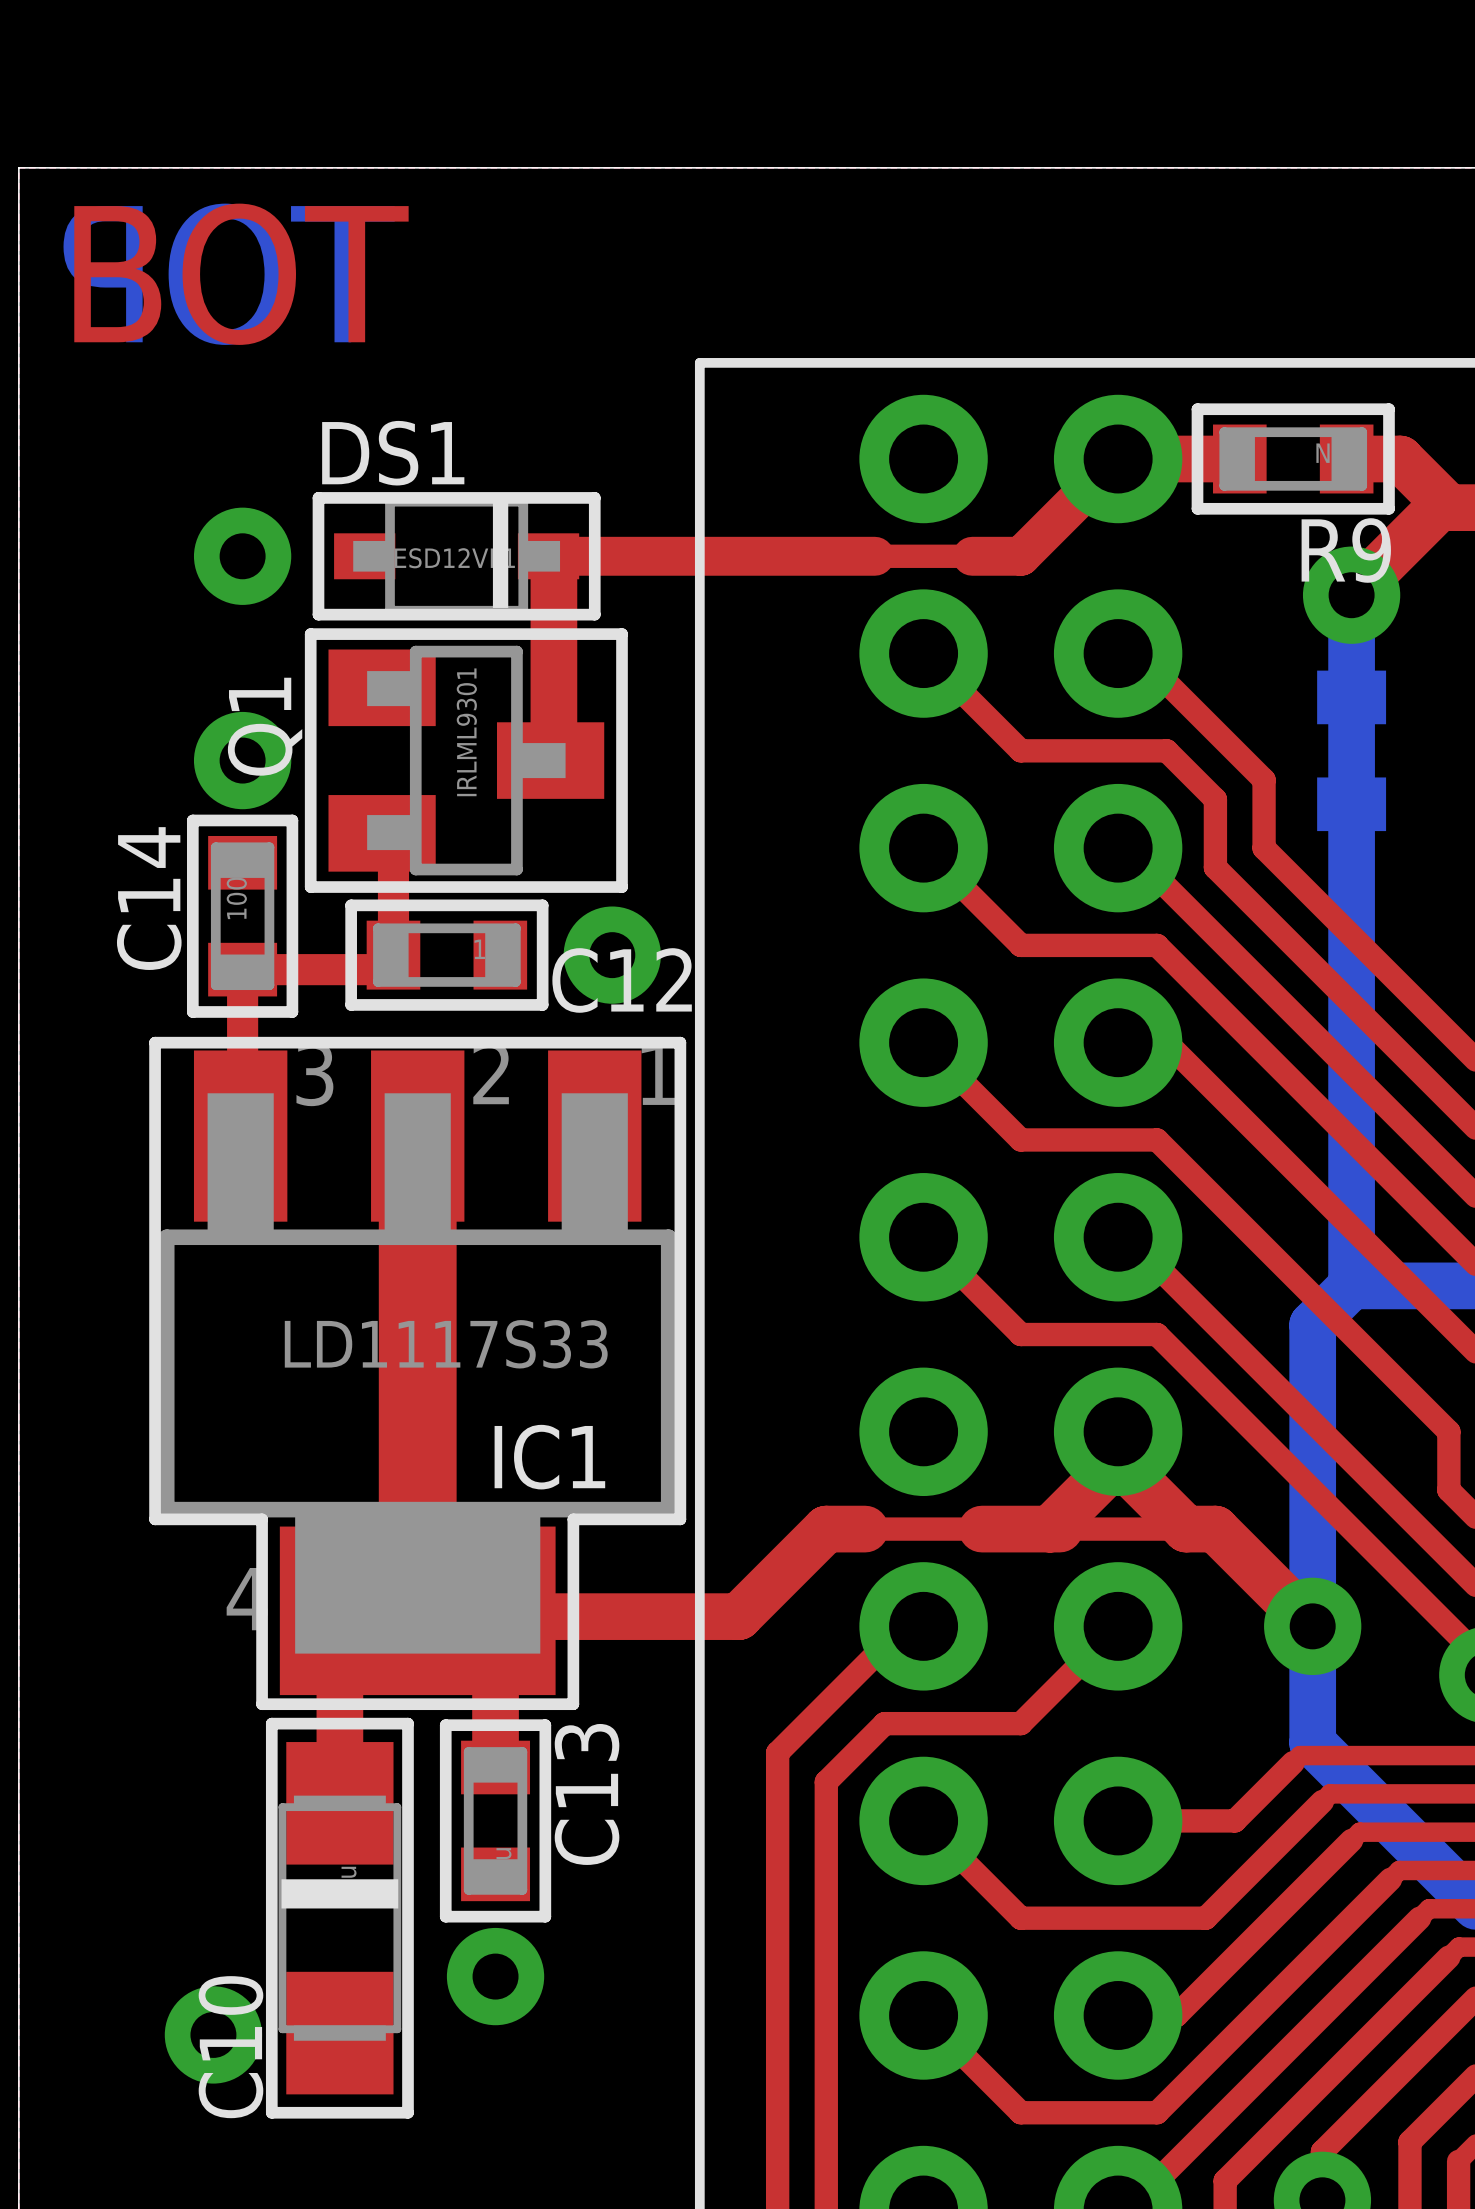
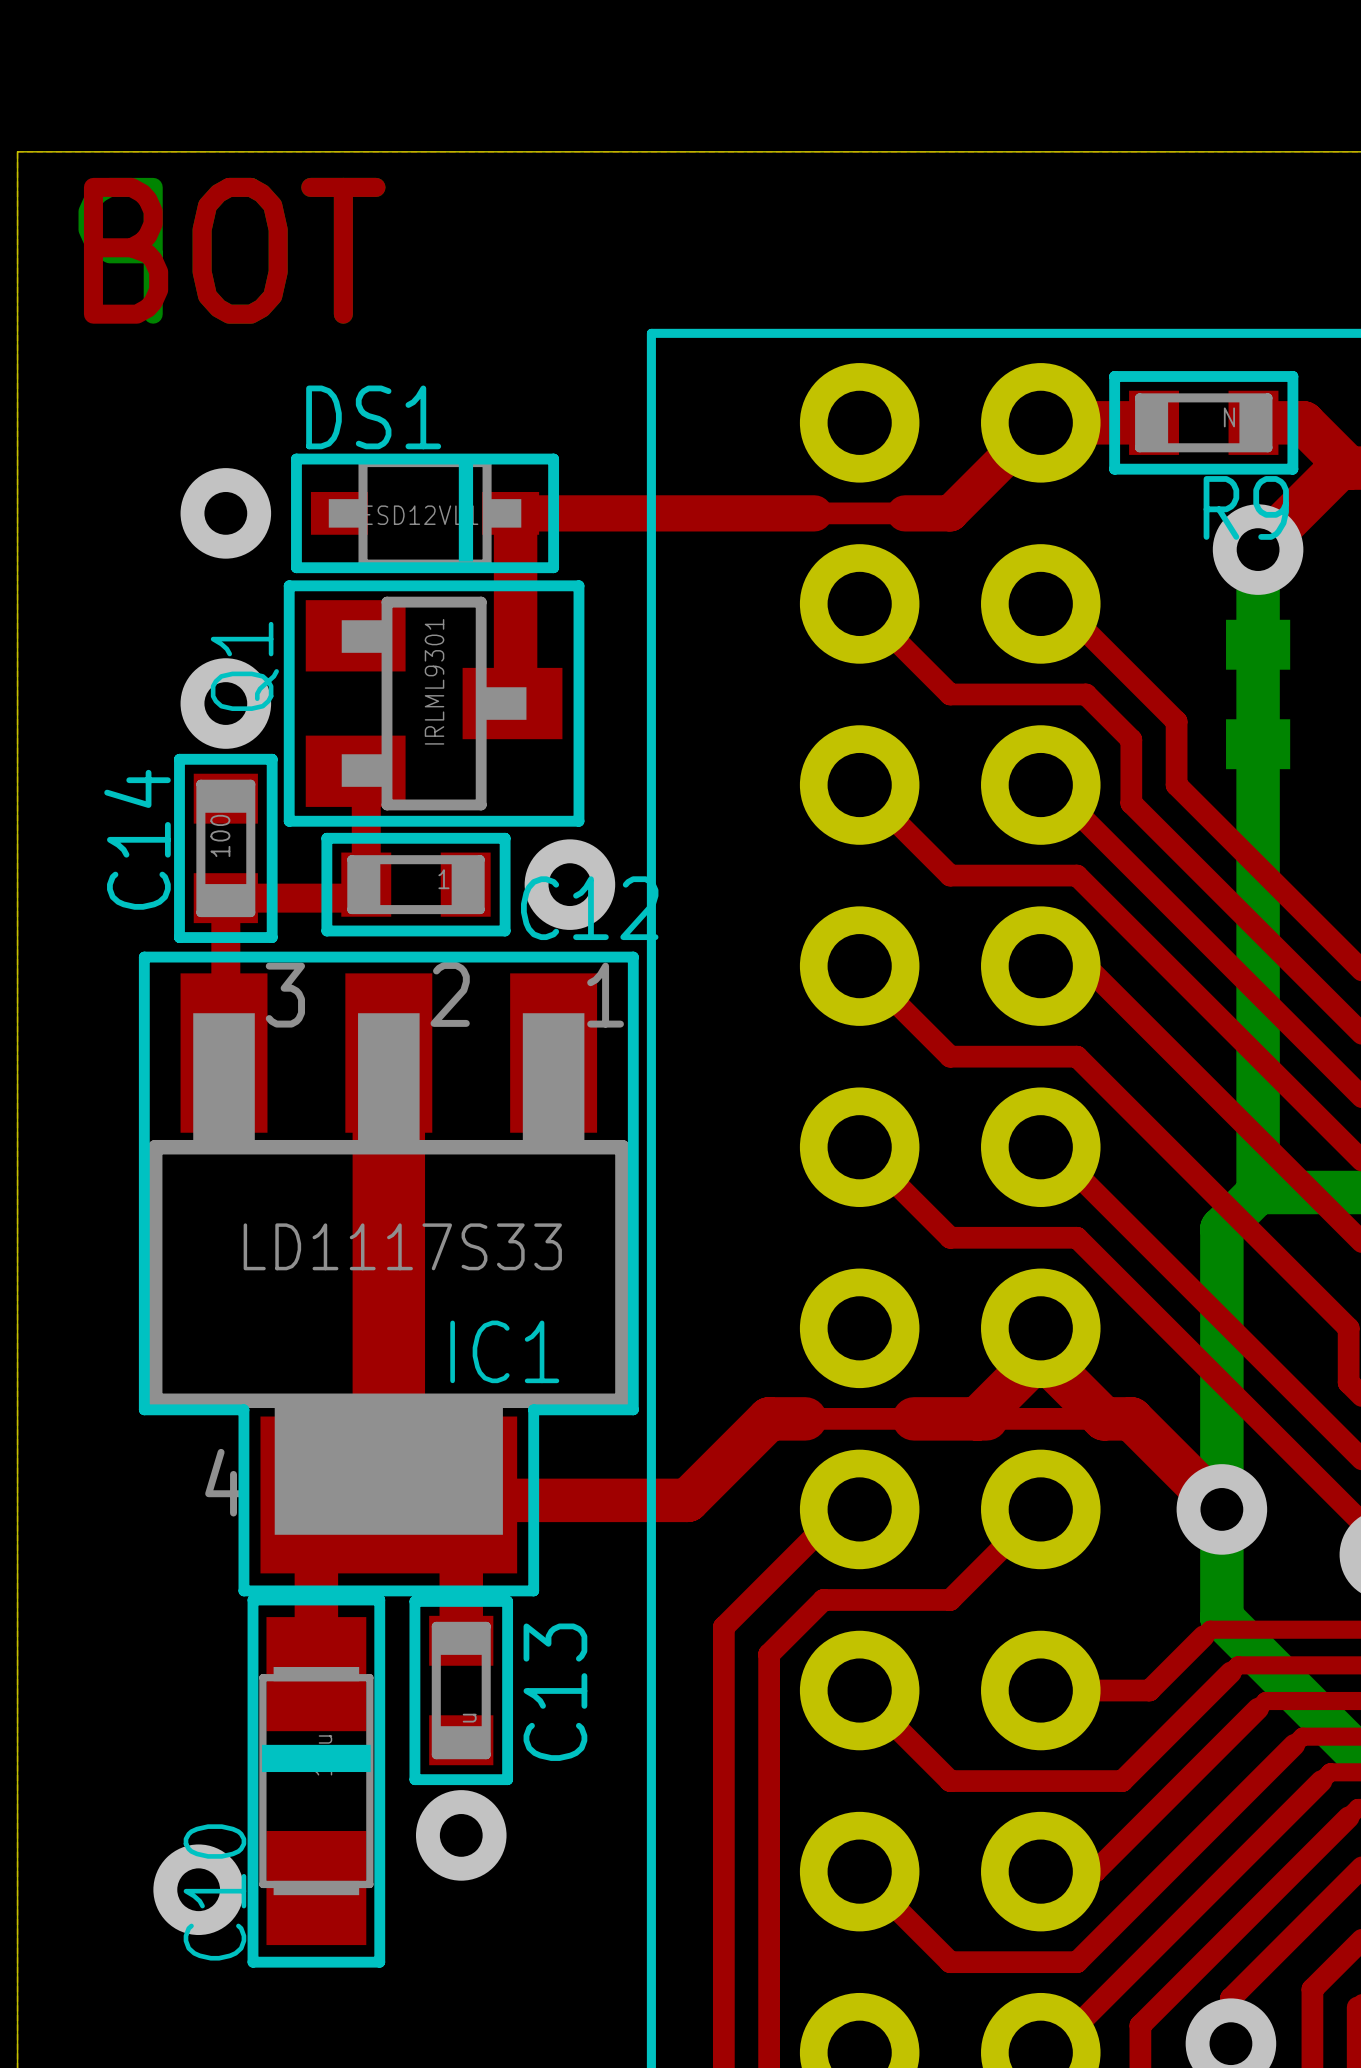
IC1 footprint: [149, 1036, 687, 1711] -> [138, 951, 639, 1597]
C13 name position: C13 (587, 1794) -> C13 (555, 1692)

